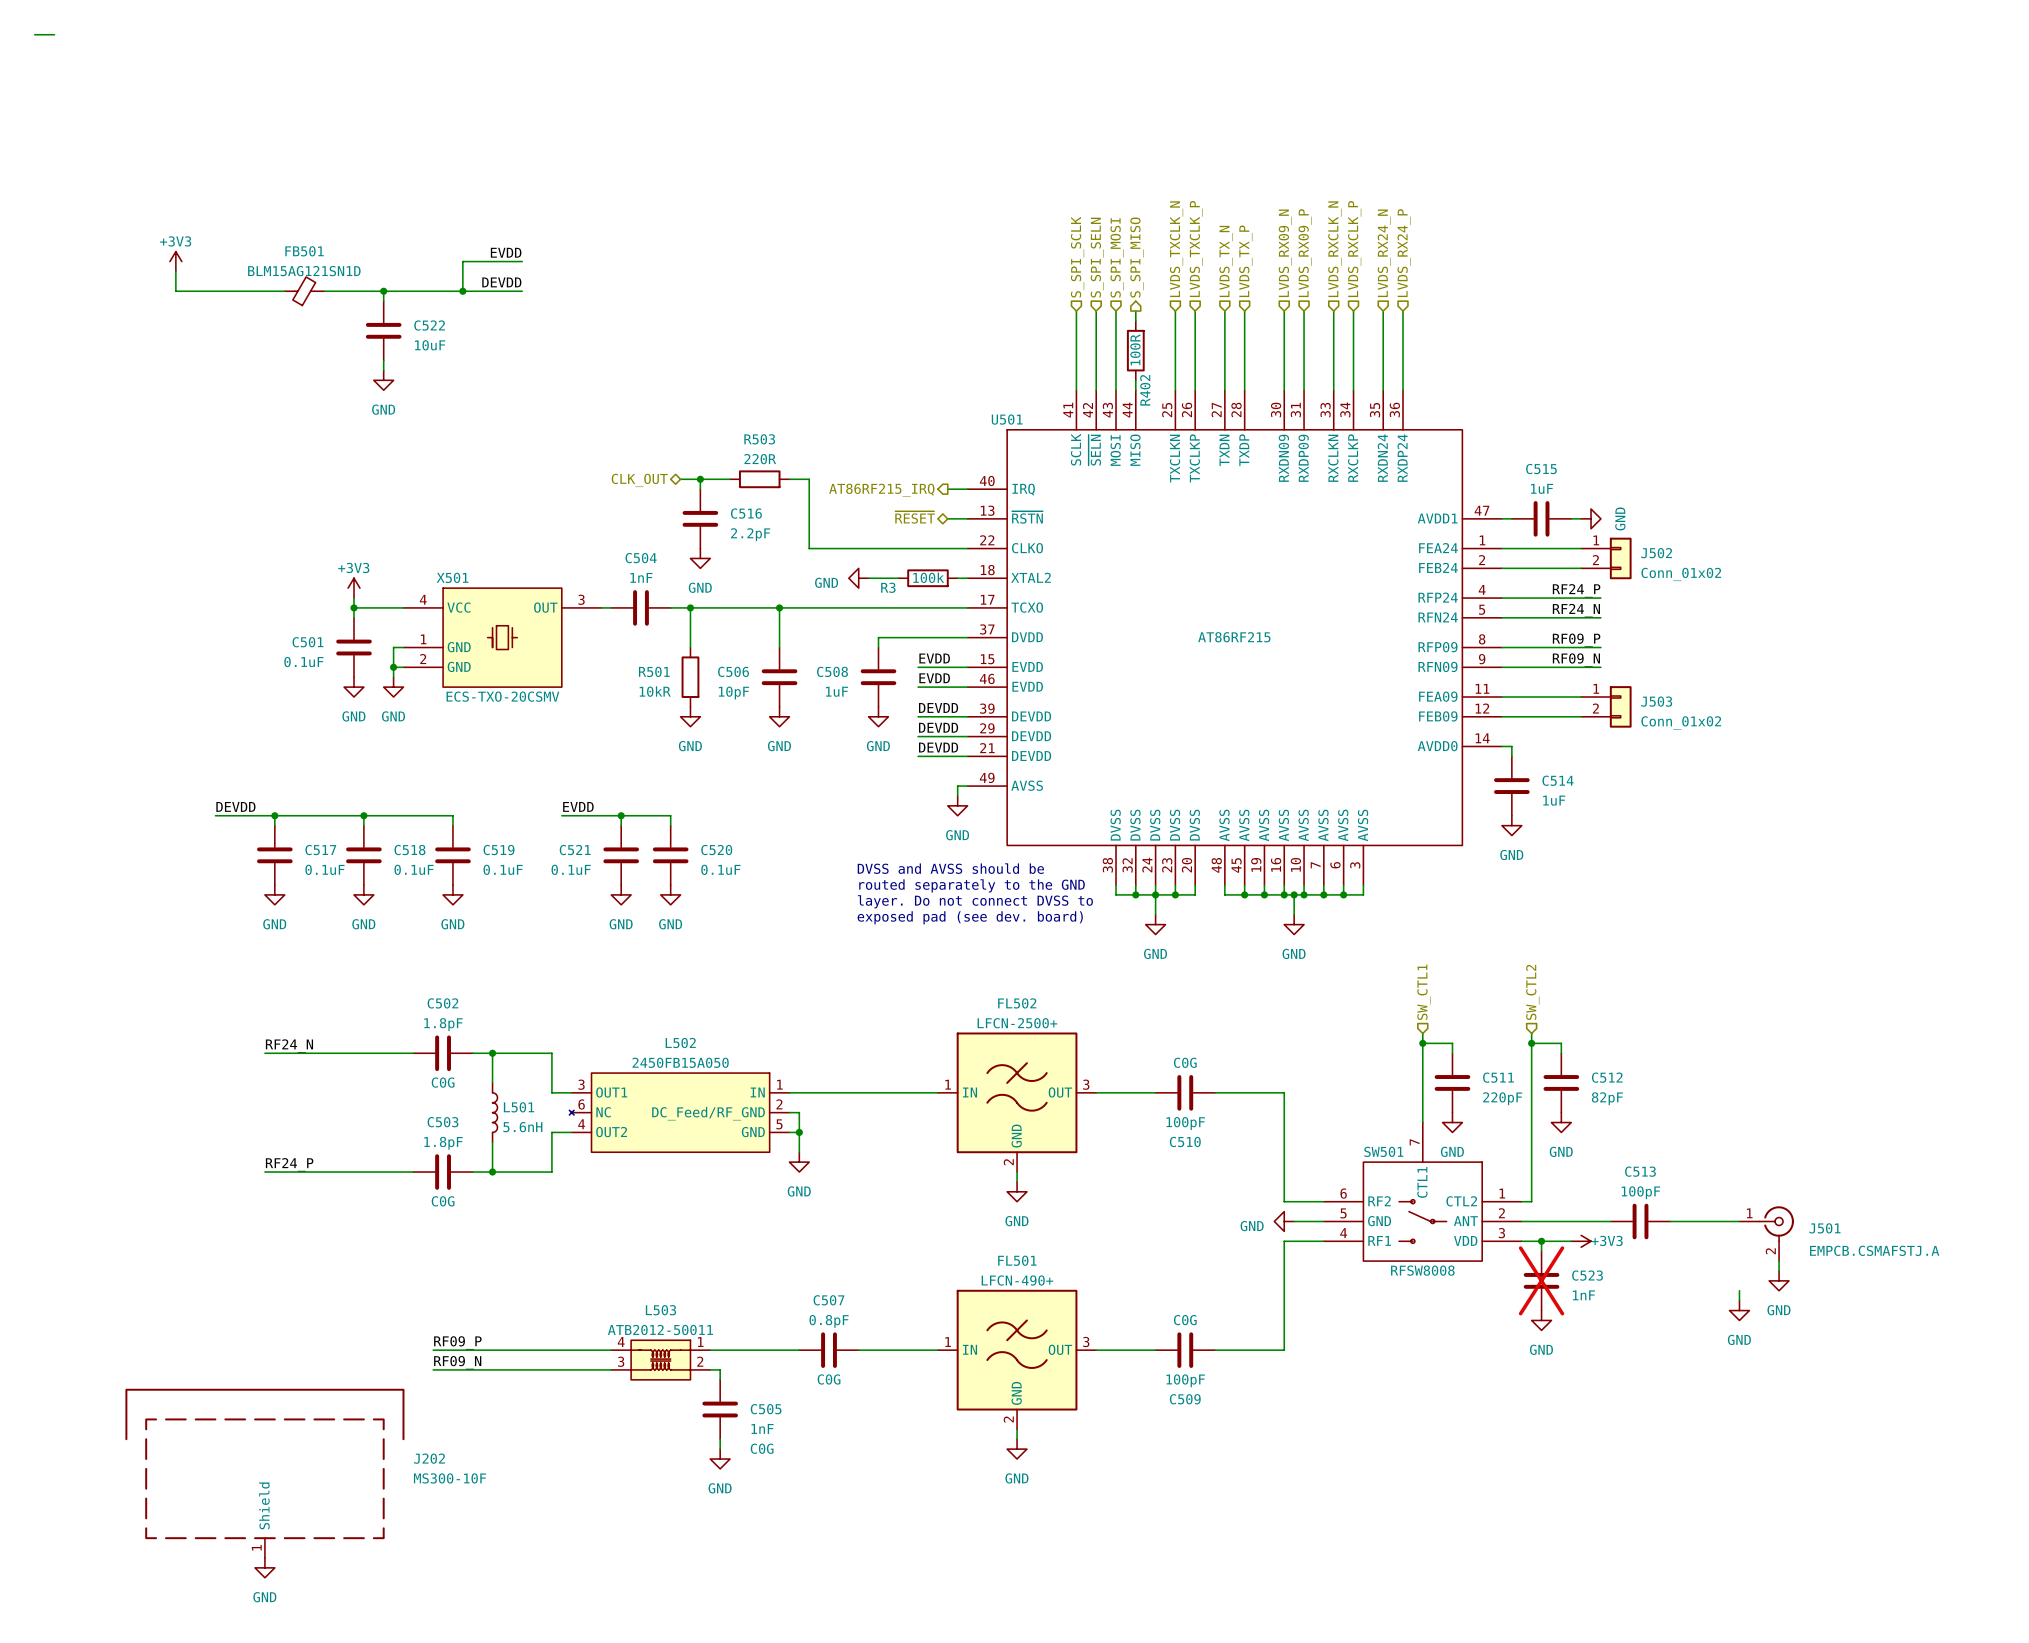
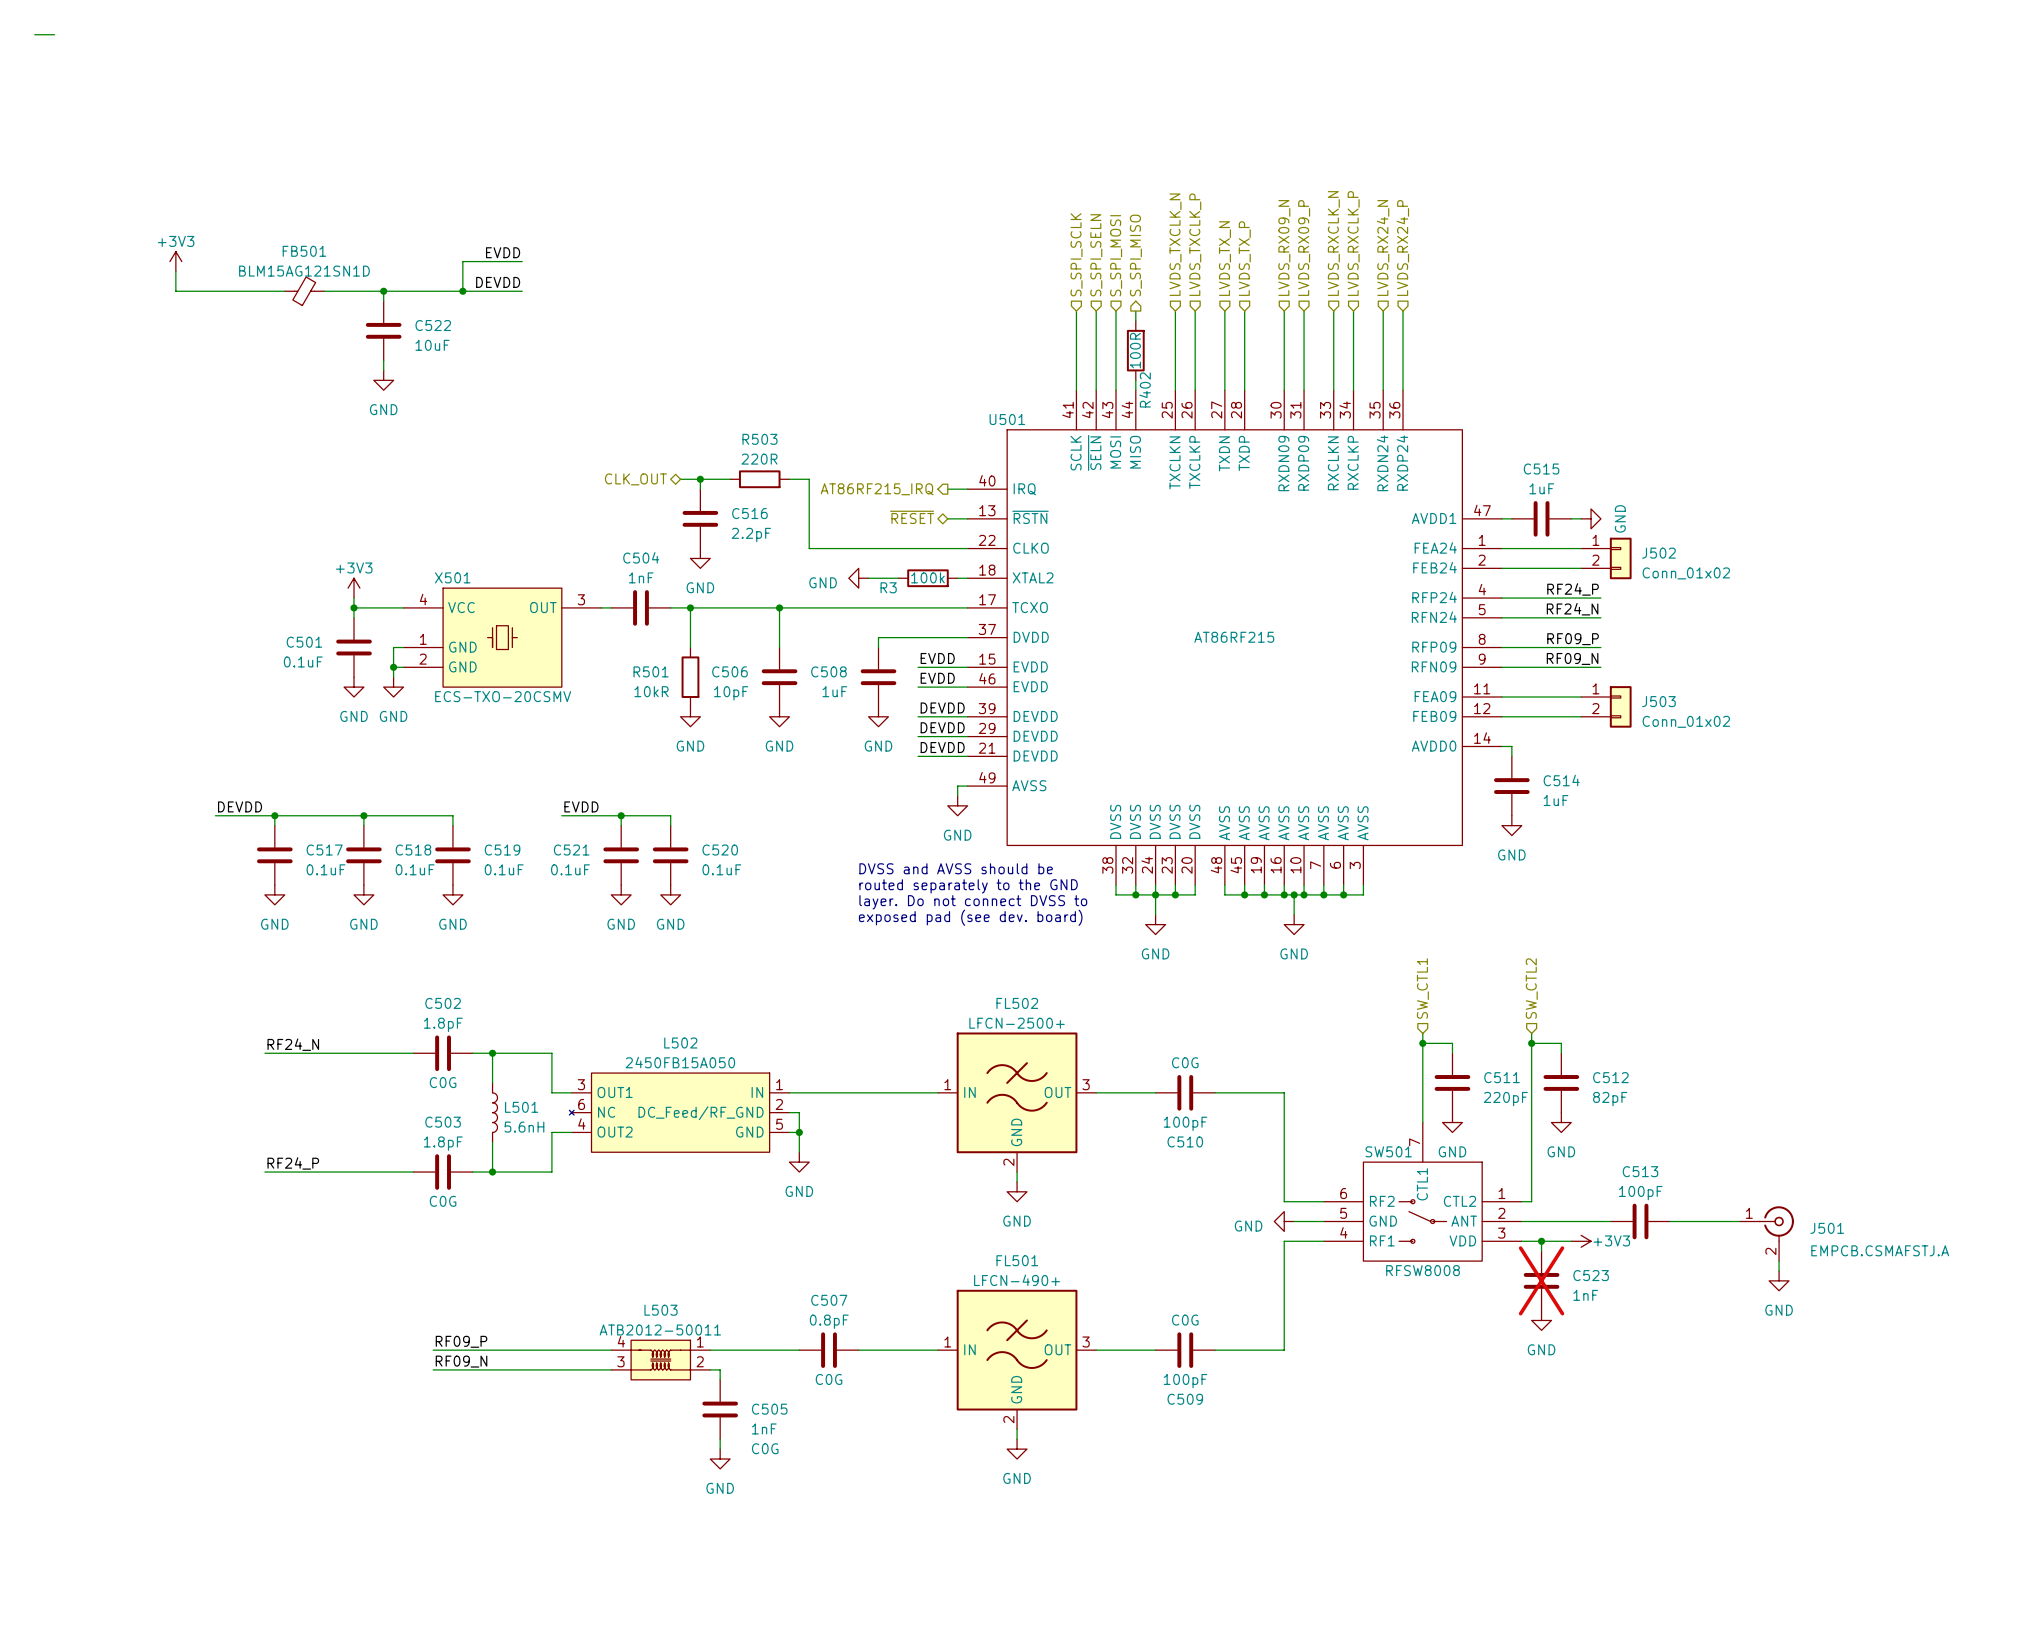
wire: (1739, 1290) (1739, 1300) -> none
power symbol: GND (1739, 1310) -> none
J202: MS300-10F (264, 1473) -> none
power symbol: GND (264, 1567) -> none

